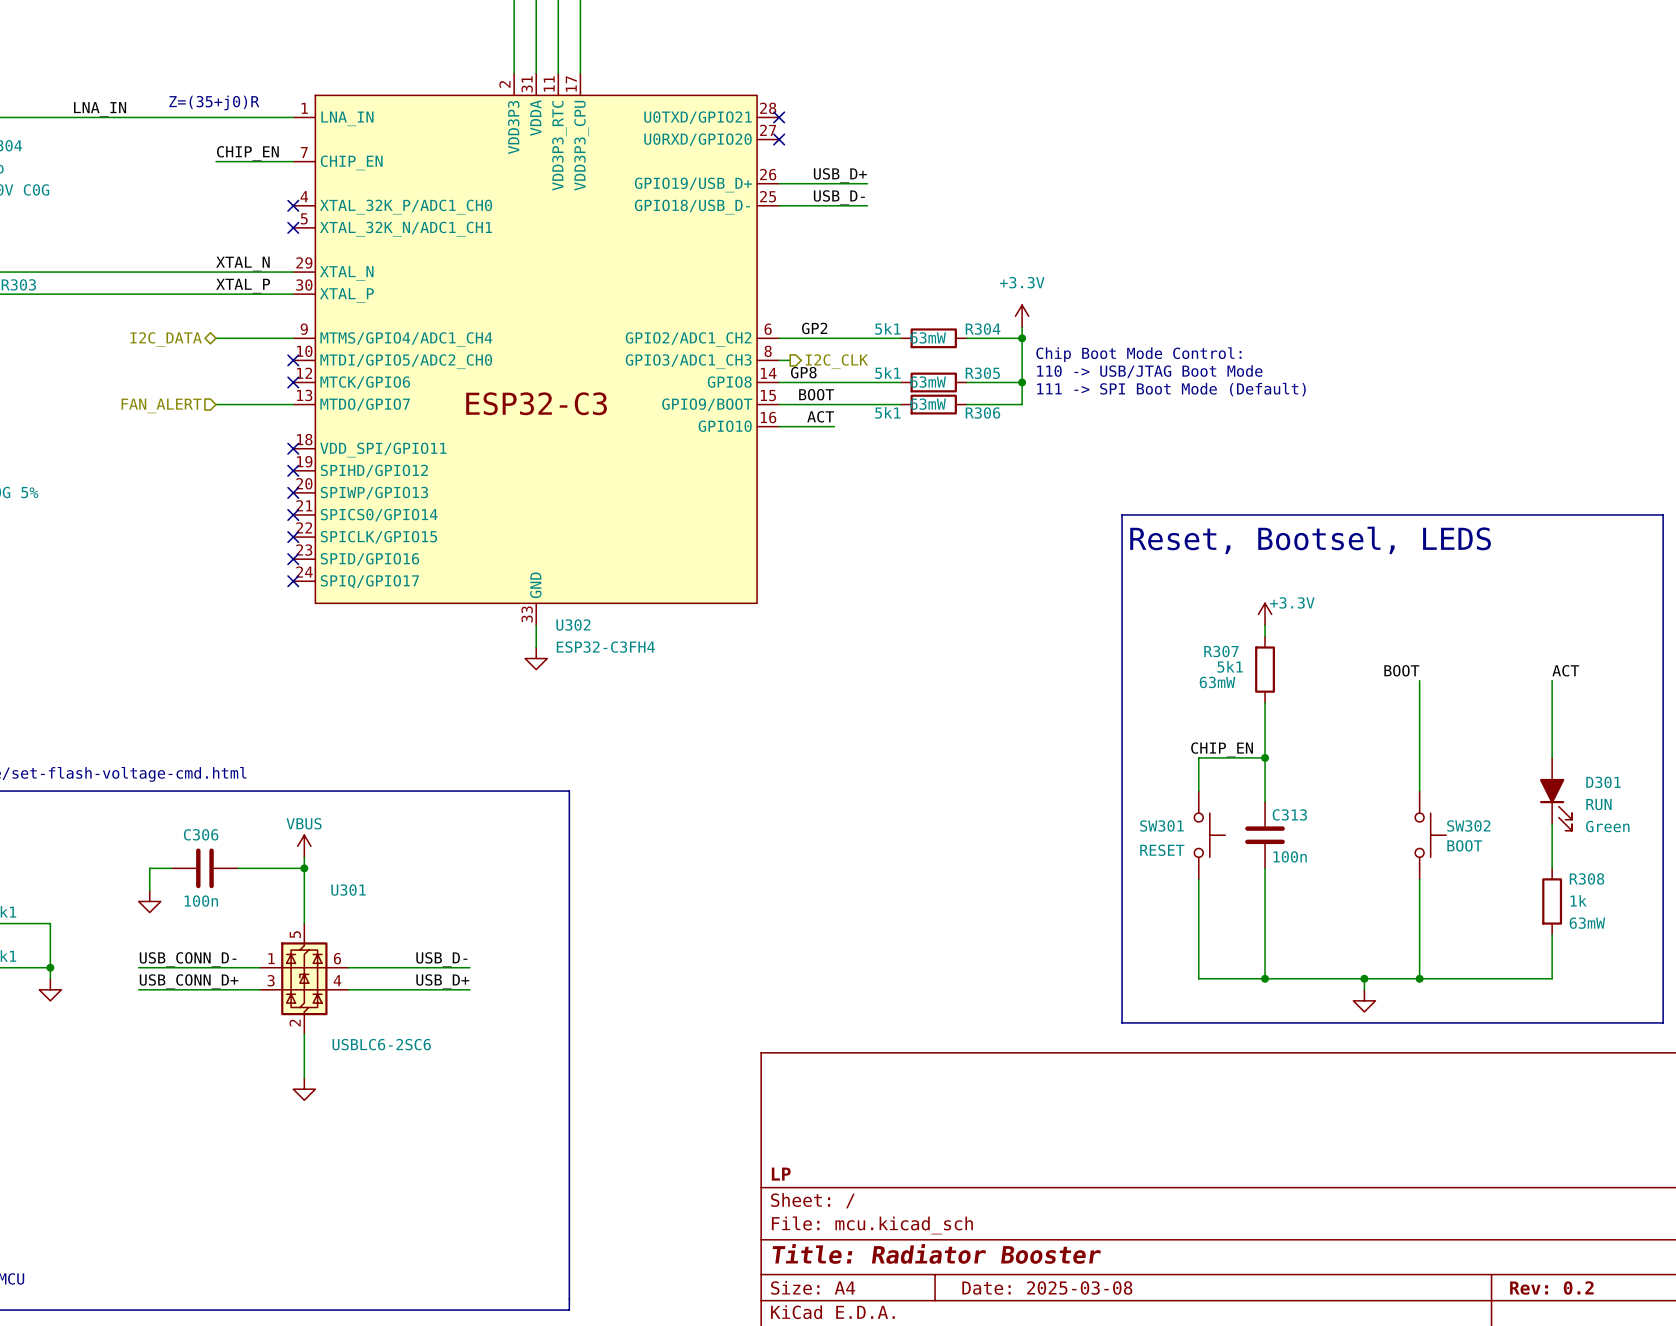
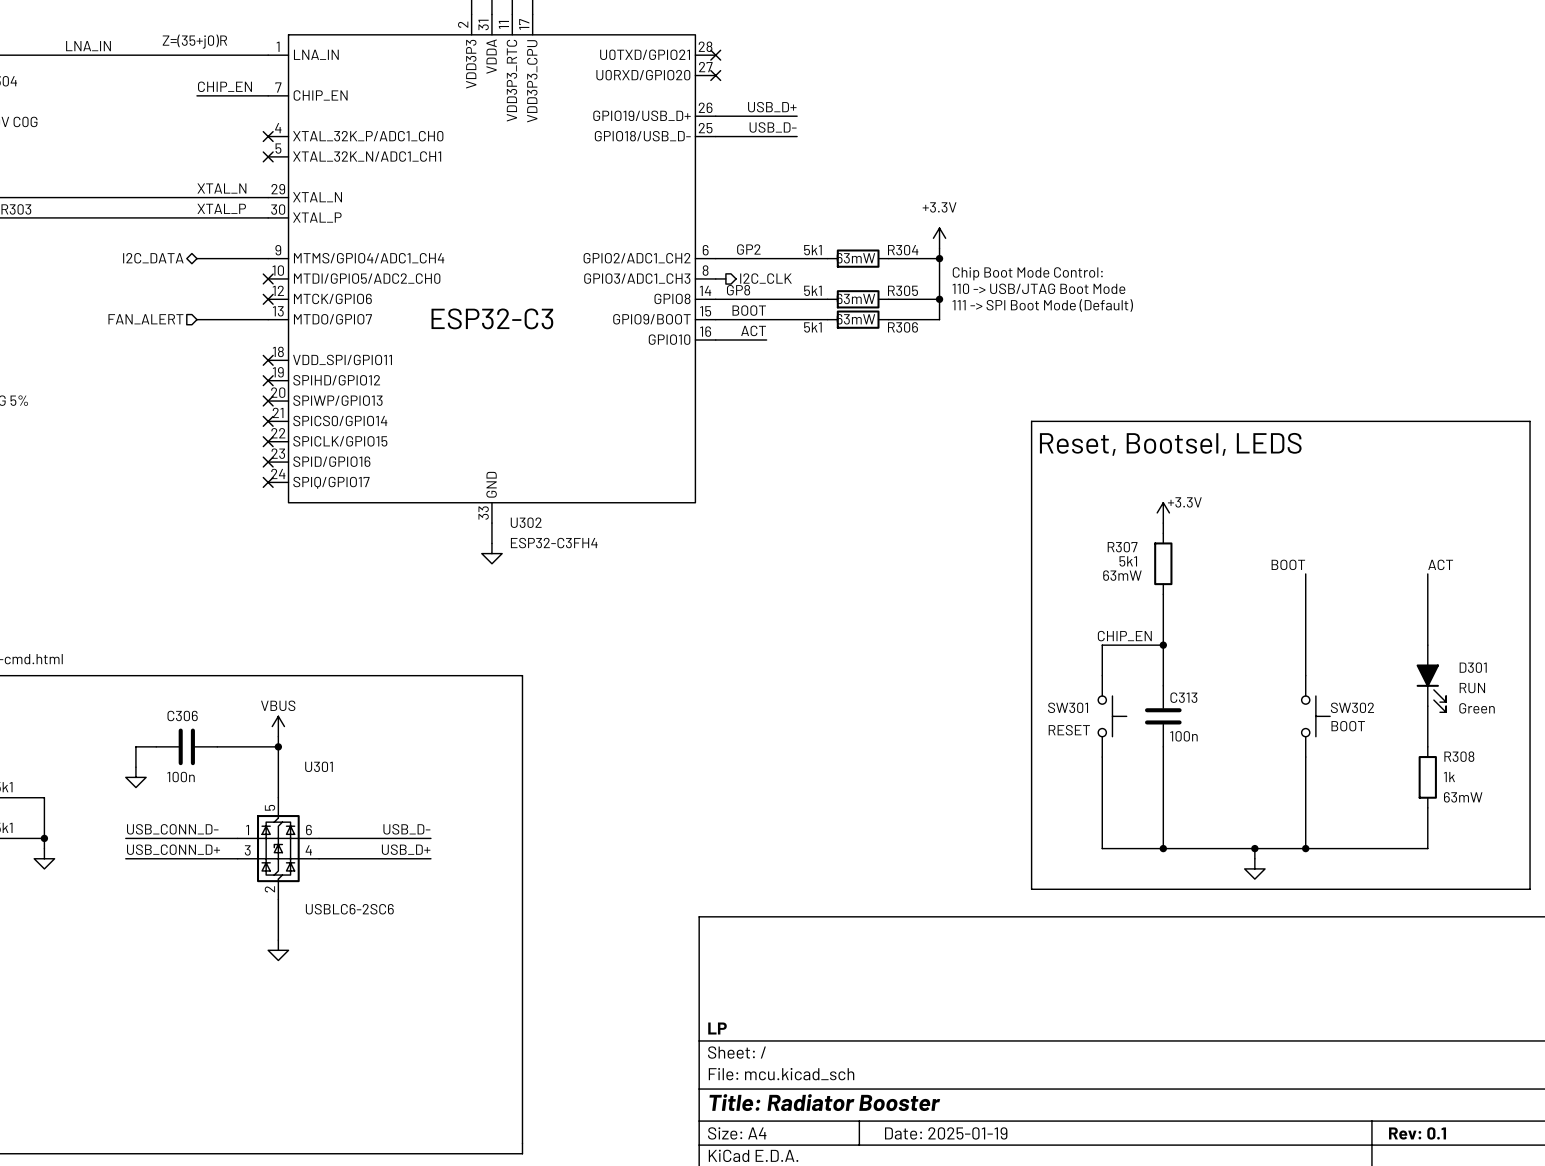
title block: Date: 2025-03-08 (1047, 1288) -> Date: 2025-01-19 (946, 1133)
title block: Rev: 0.2 (1551, 1288) -> Rev: 0.1 (1417, 1133)

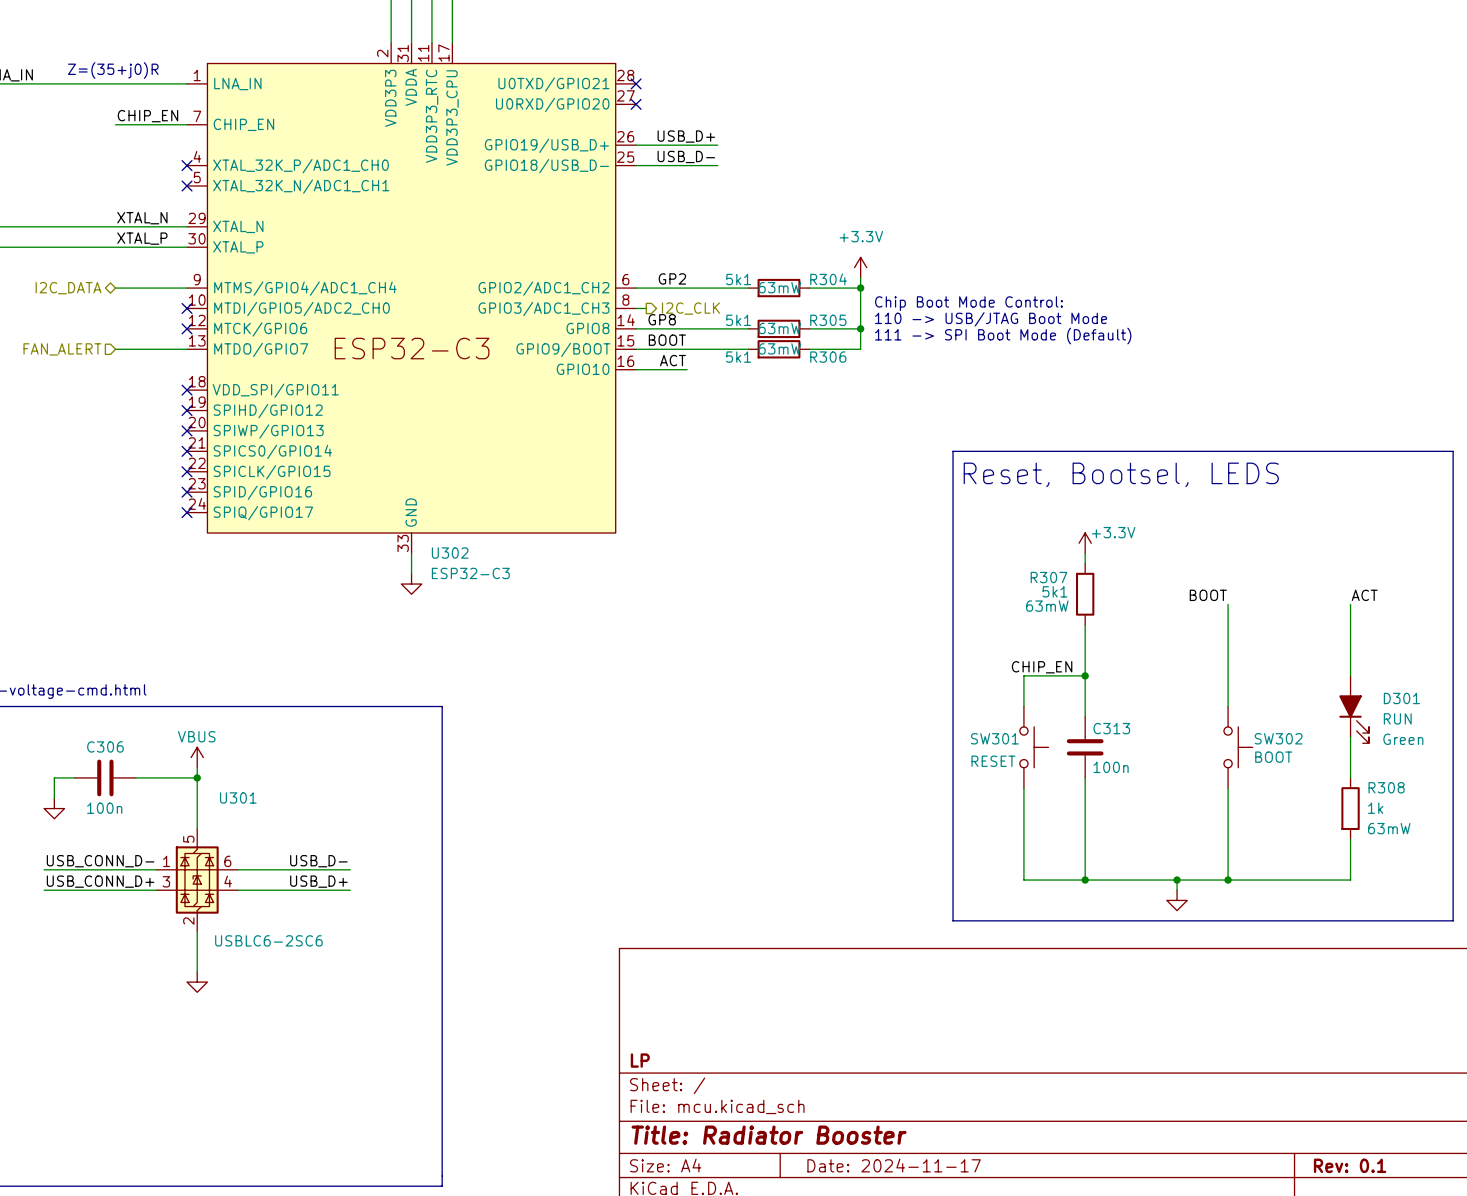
U302 value: ESP32-C3FH4 (554, 543) -> ESP32-C3 (470, 573)
title block: Date: 2025-01-19 (946, 1133) -> Date: 2024-11-17 (894, 1165)

